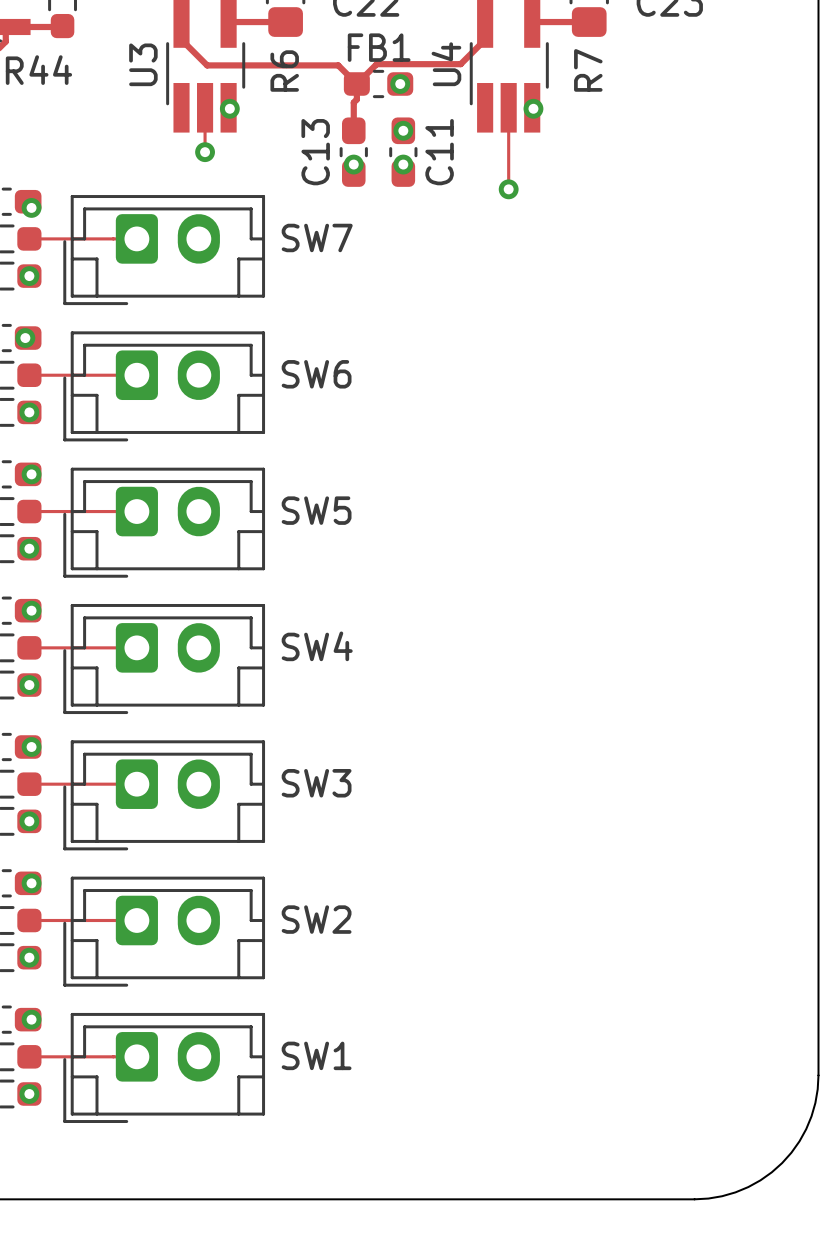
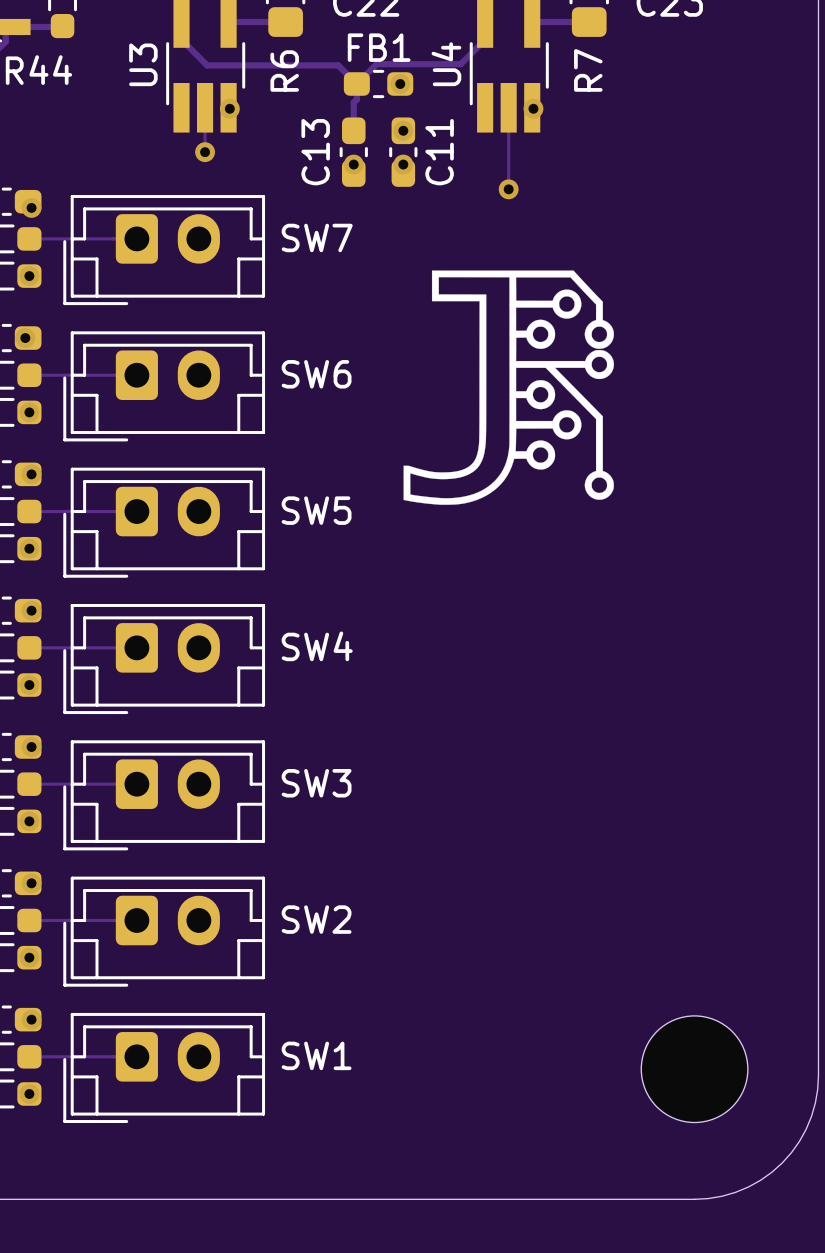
drawing: none -> [403, 270, 614, 505]
part: none -> (694, 1069)

